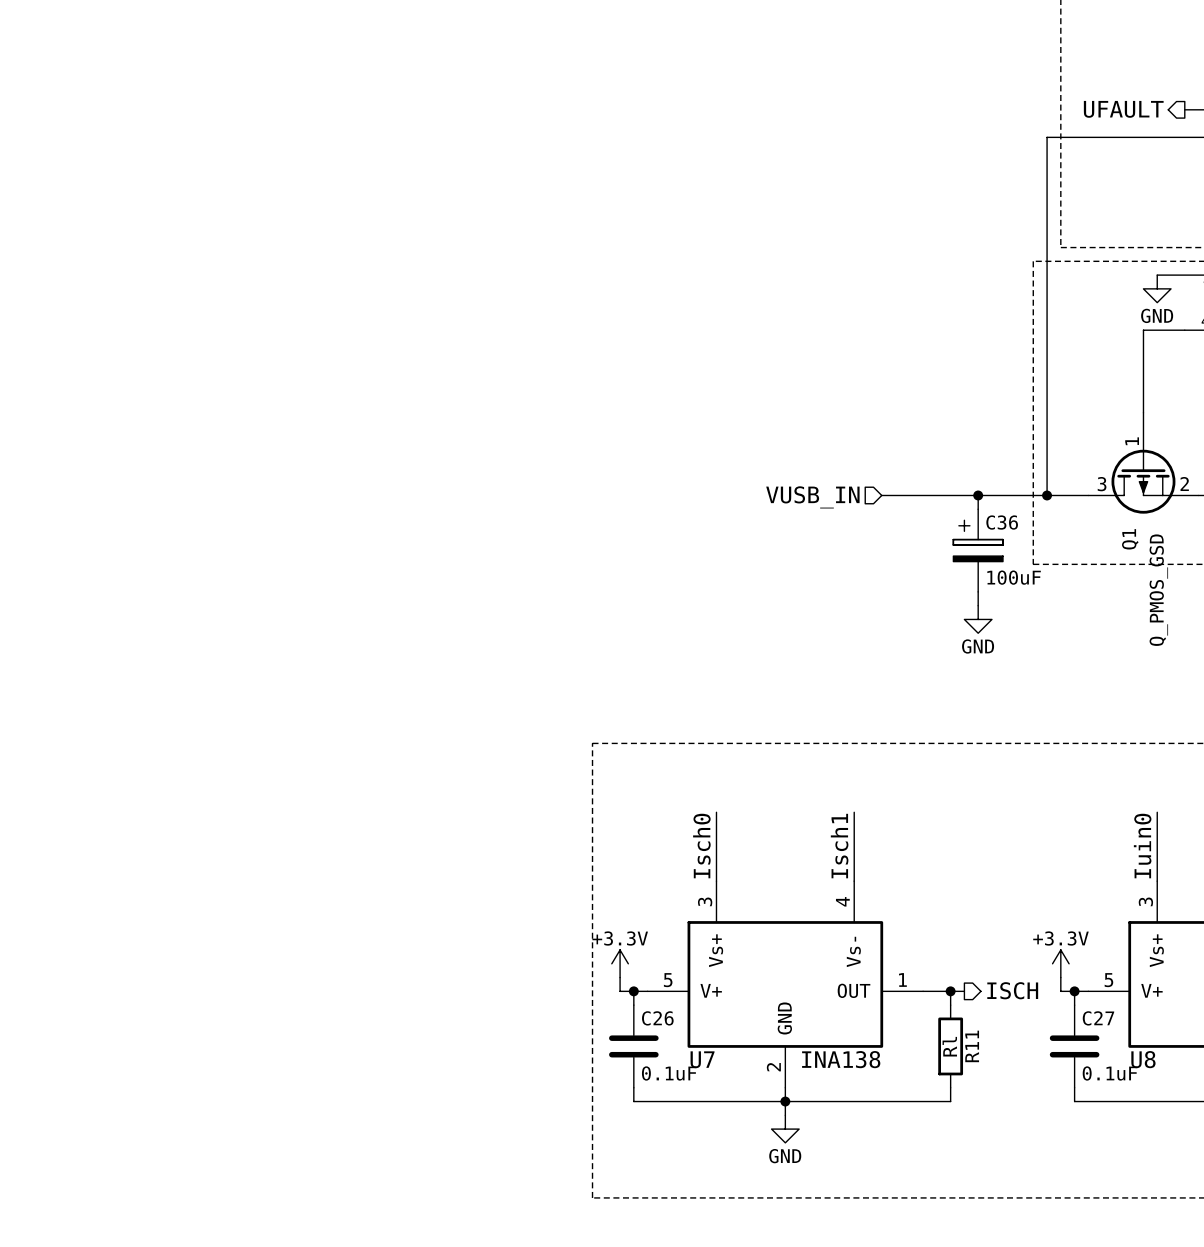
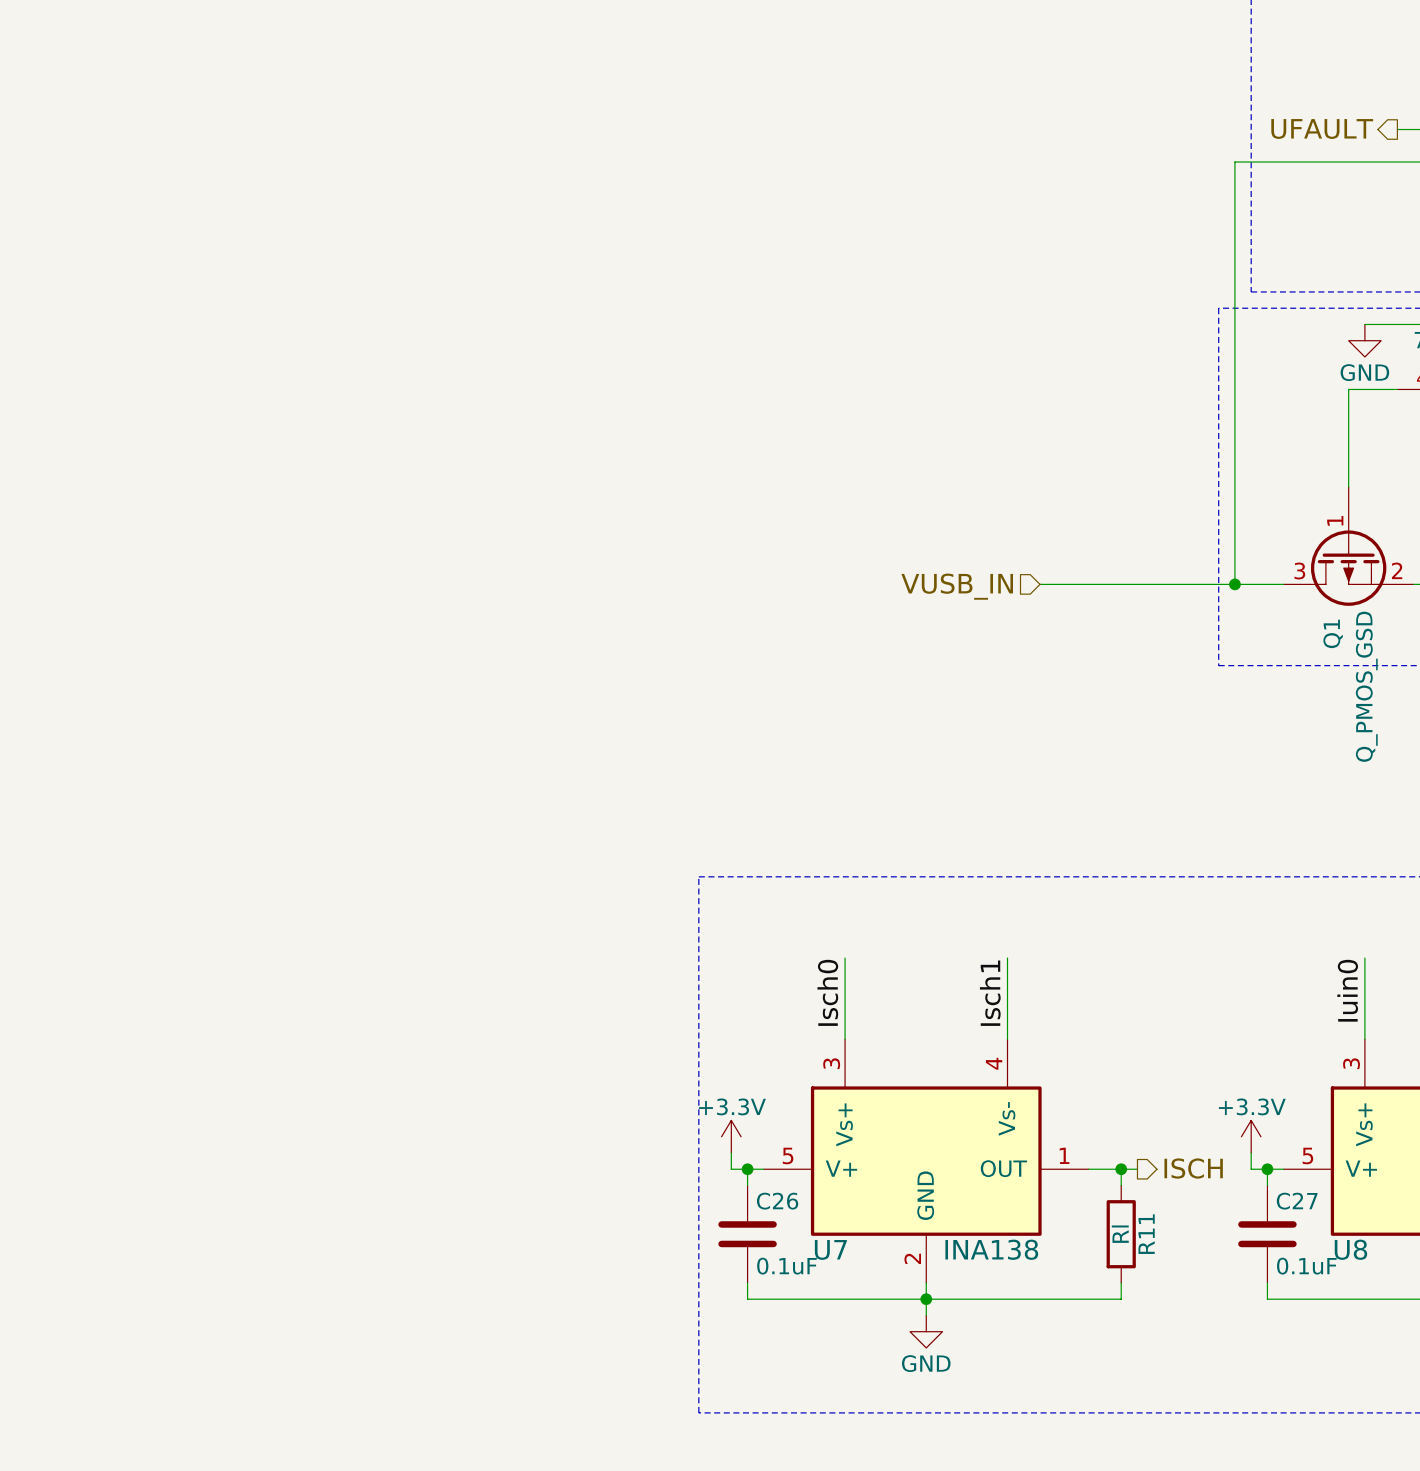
wire: (978, 495) (978, 509) -> none
junction: (978, 495) -> none
C36: 100uF (978, 550) -> none
wire: (978, 591) (978, 605) -> none
power symbol: GND (978, 619) -> none

